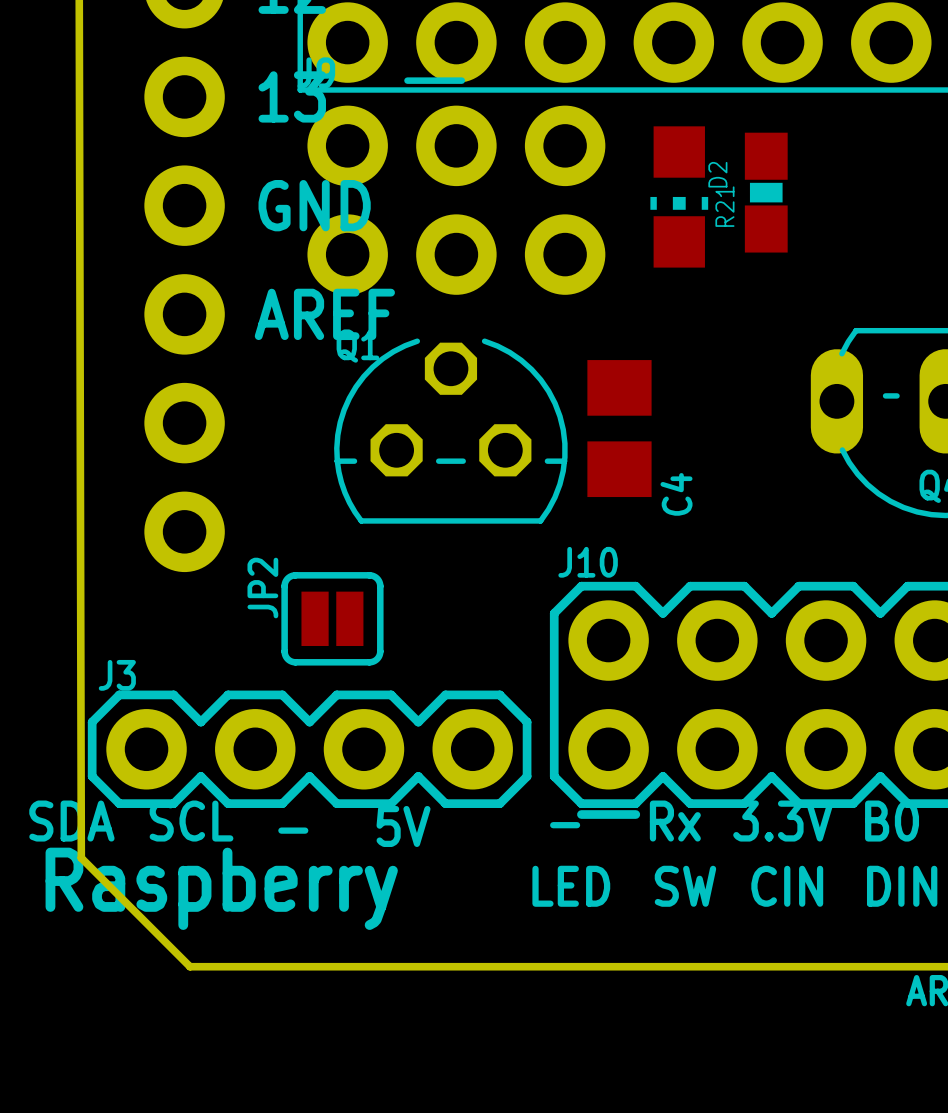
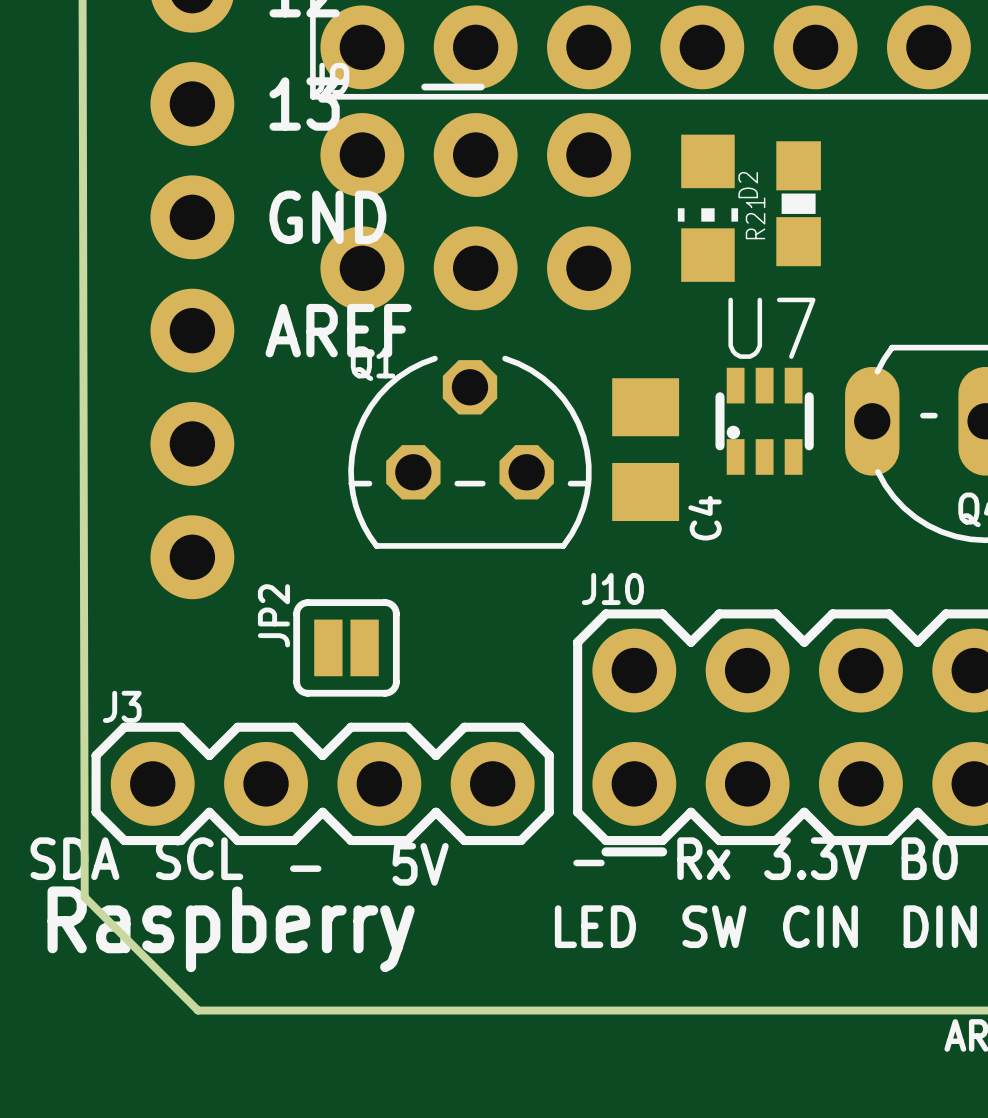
U7: none -> (764, 421)

